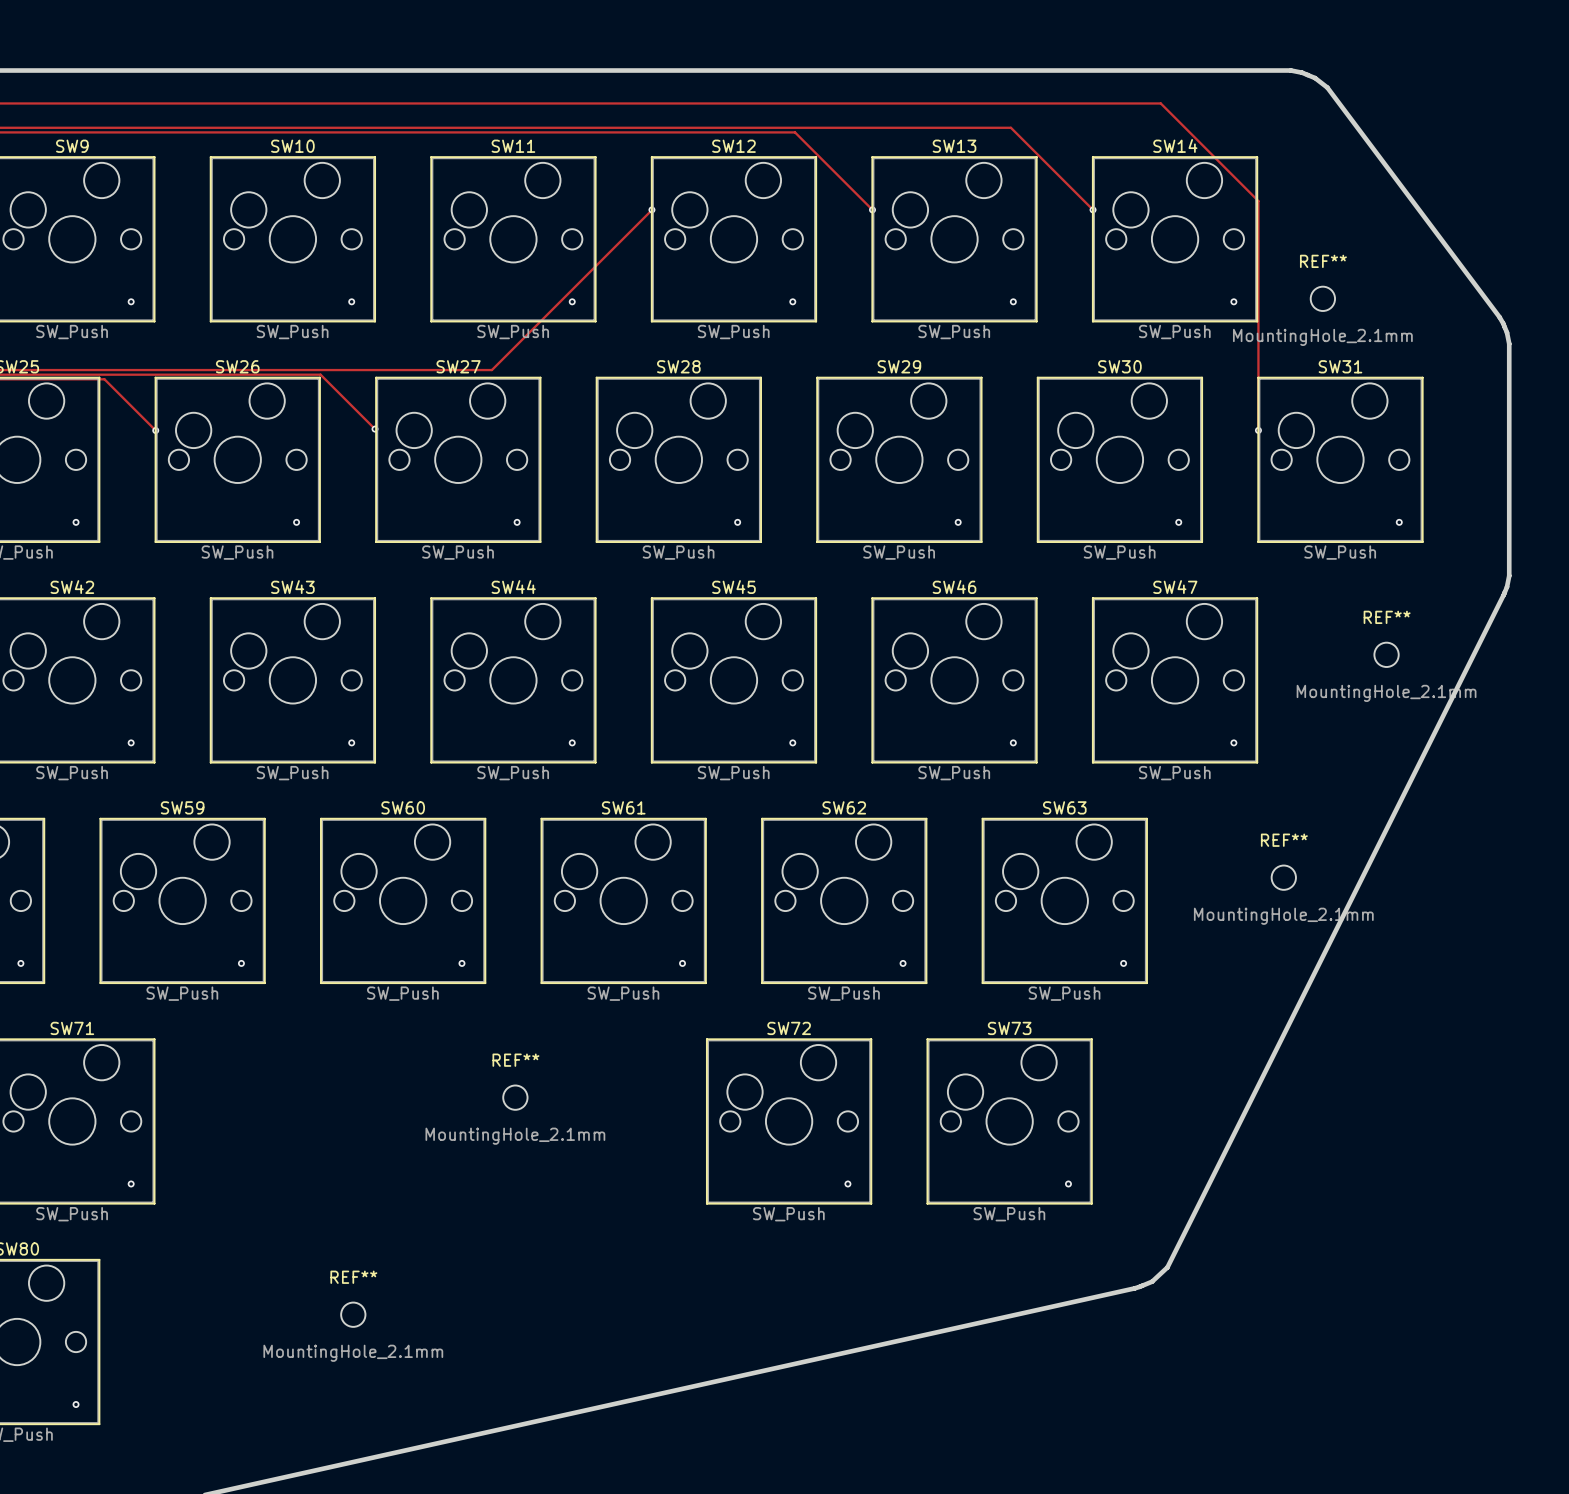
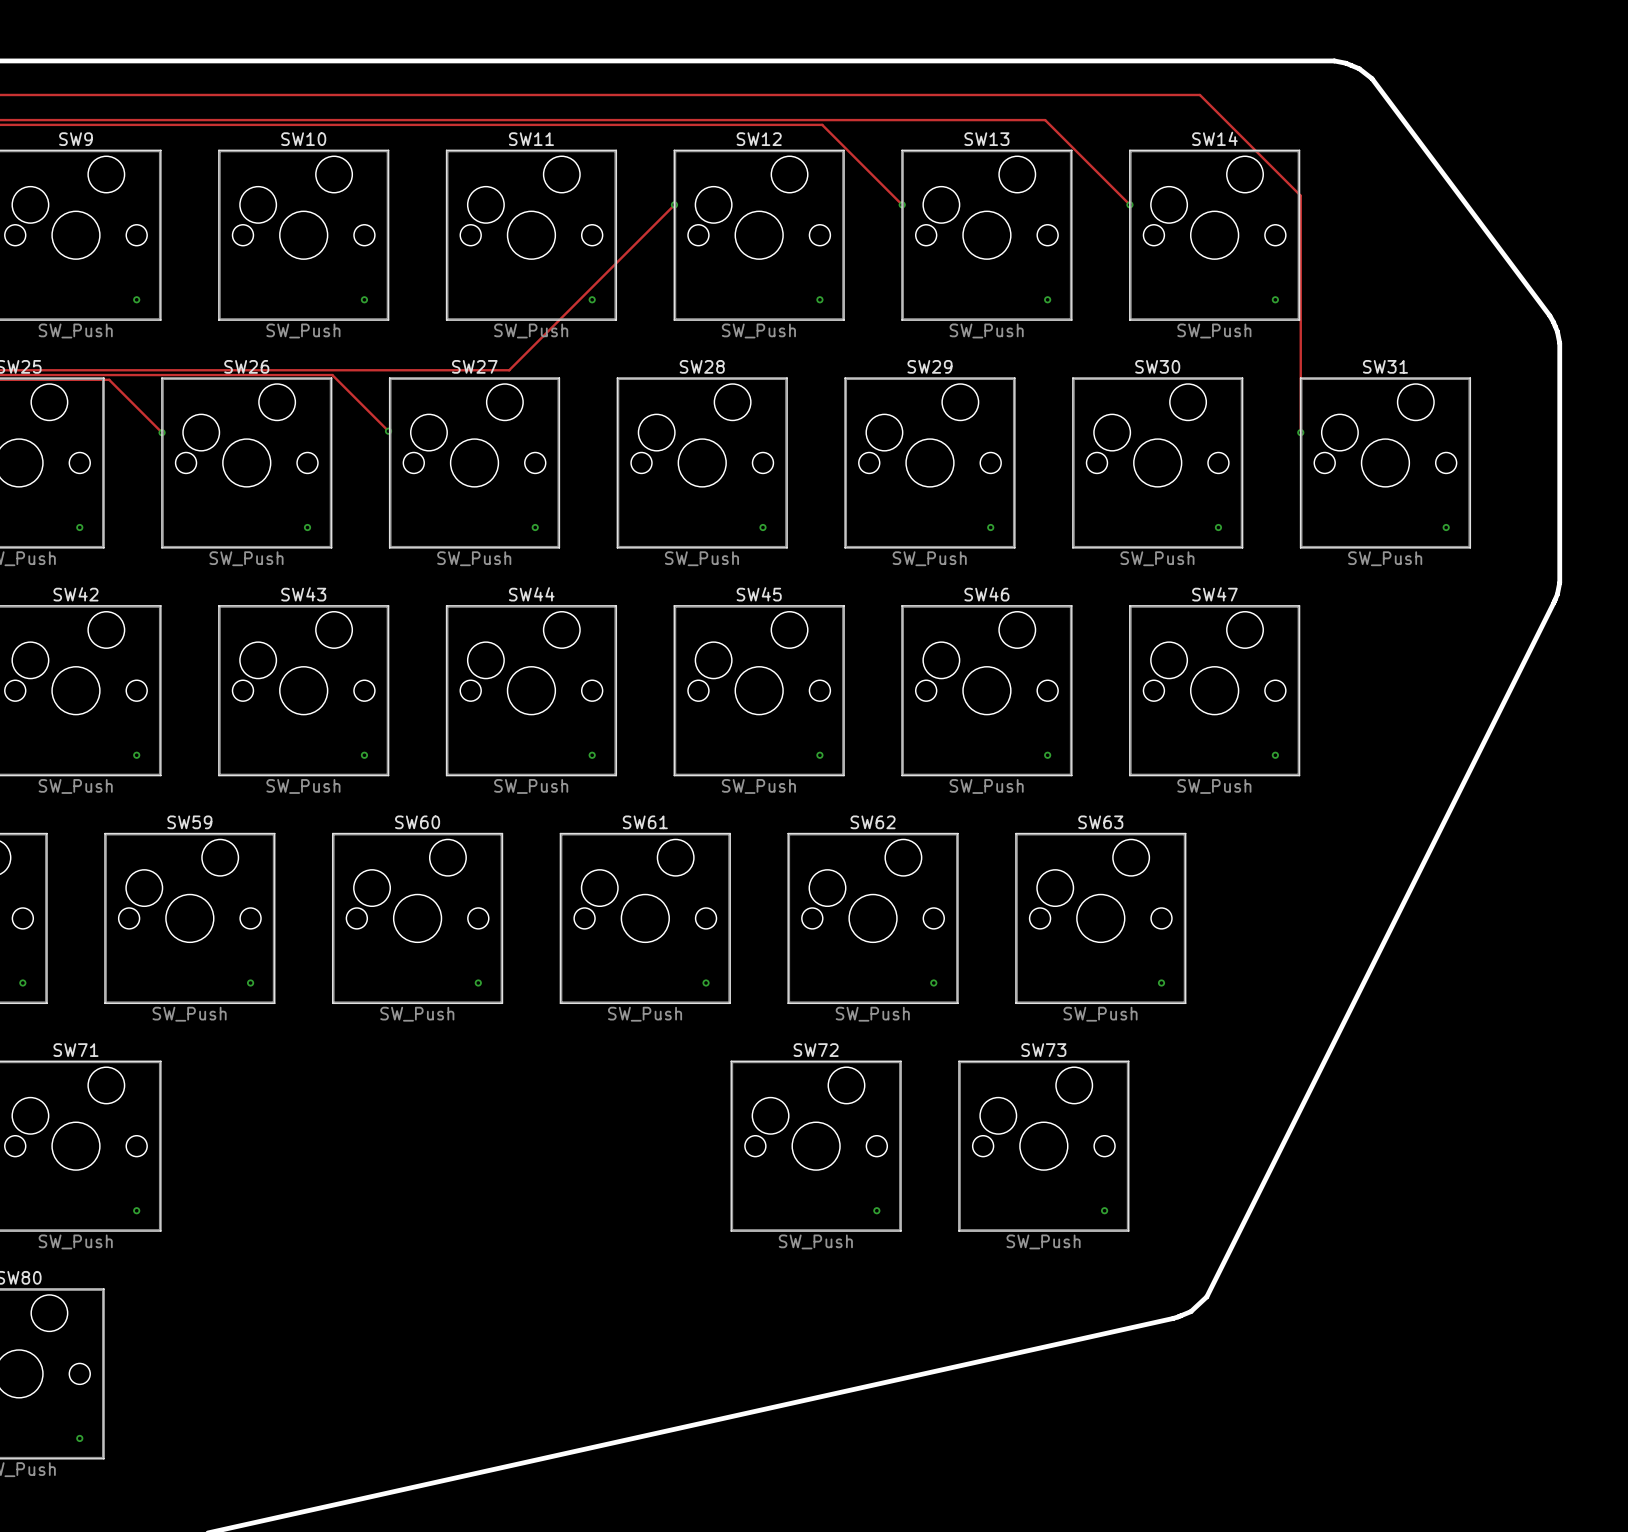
REF**: MountingHole_2.1mm (1322, 298) -> none
REF**: MountingHole_2.1mm (1386, 654) -> none
REF**: MountingHole_2.1mm (1283, 877) -> none
REF**: MountingHole_2.1mm (515, 1097) -> none
REF**: MountingHole_2.1mm (353, 1314) -> none

